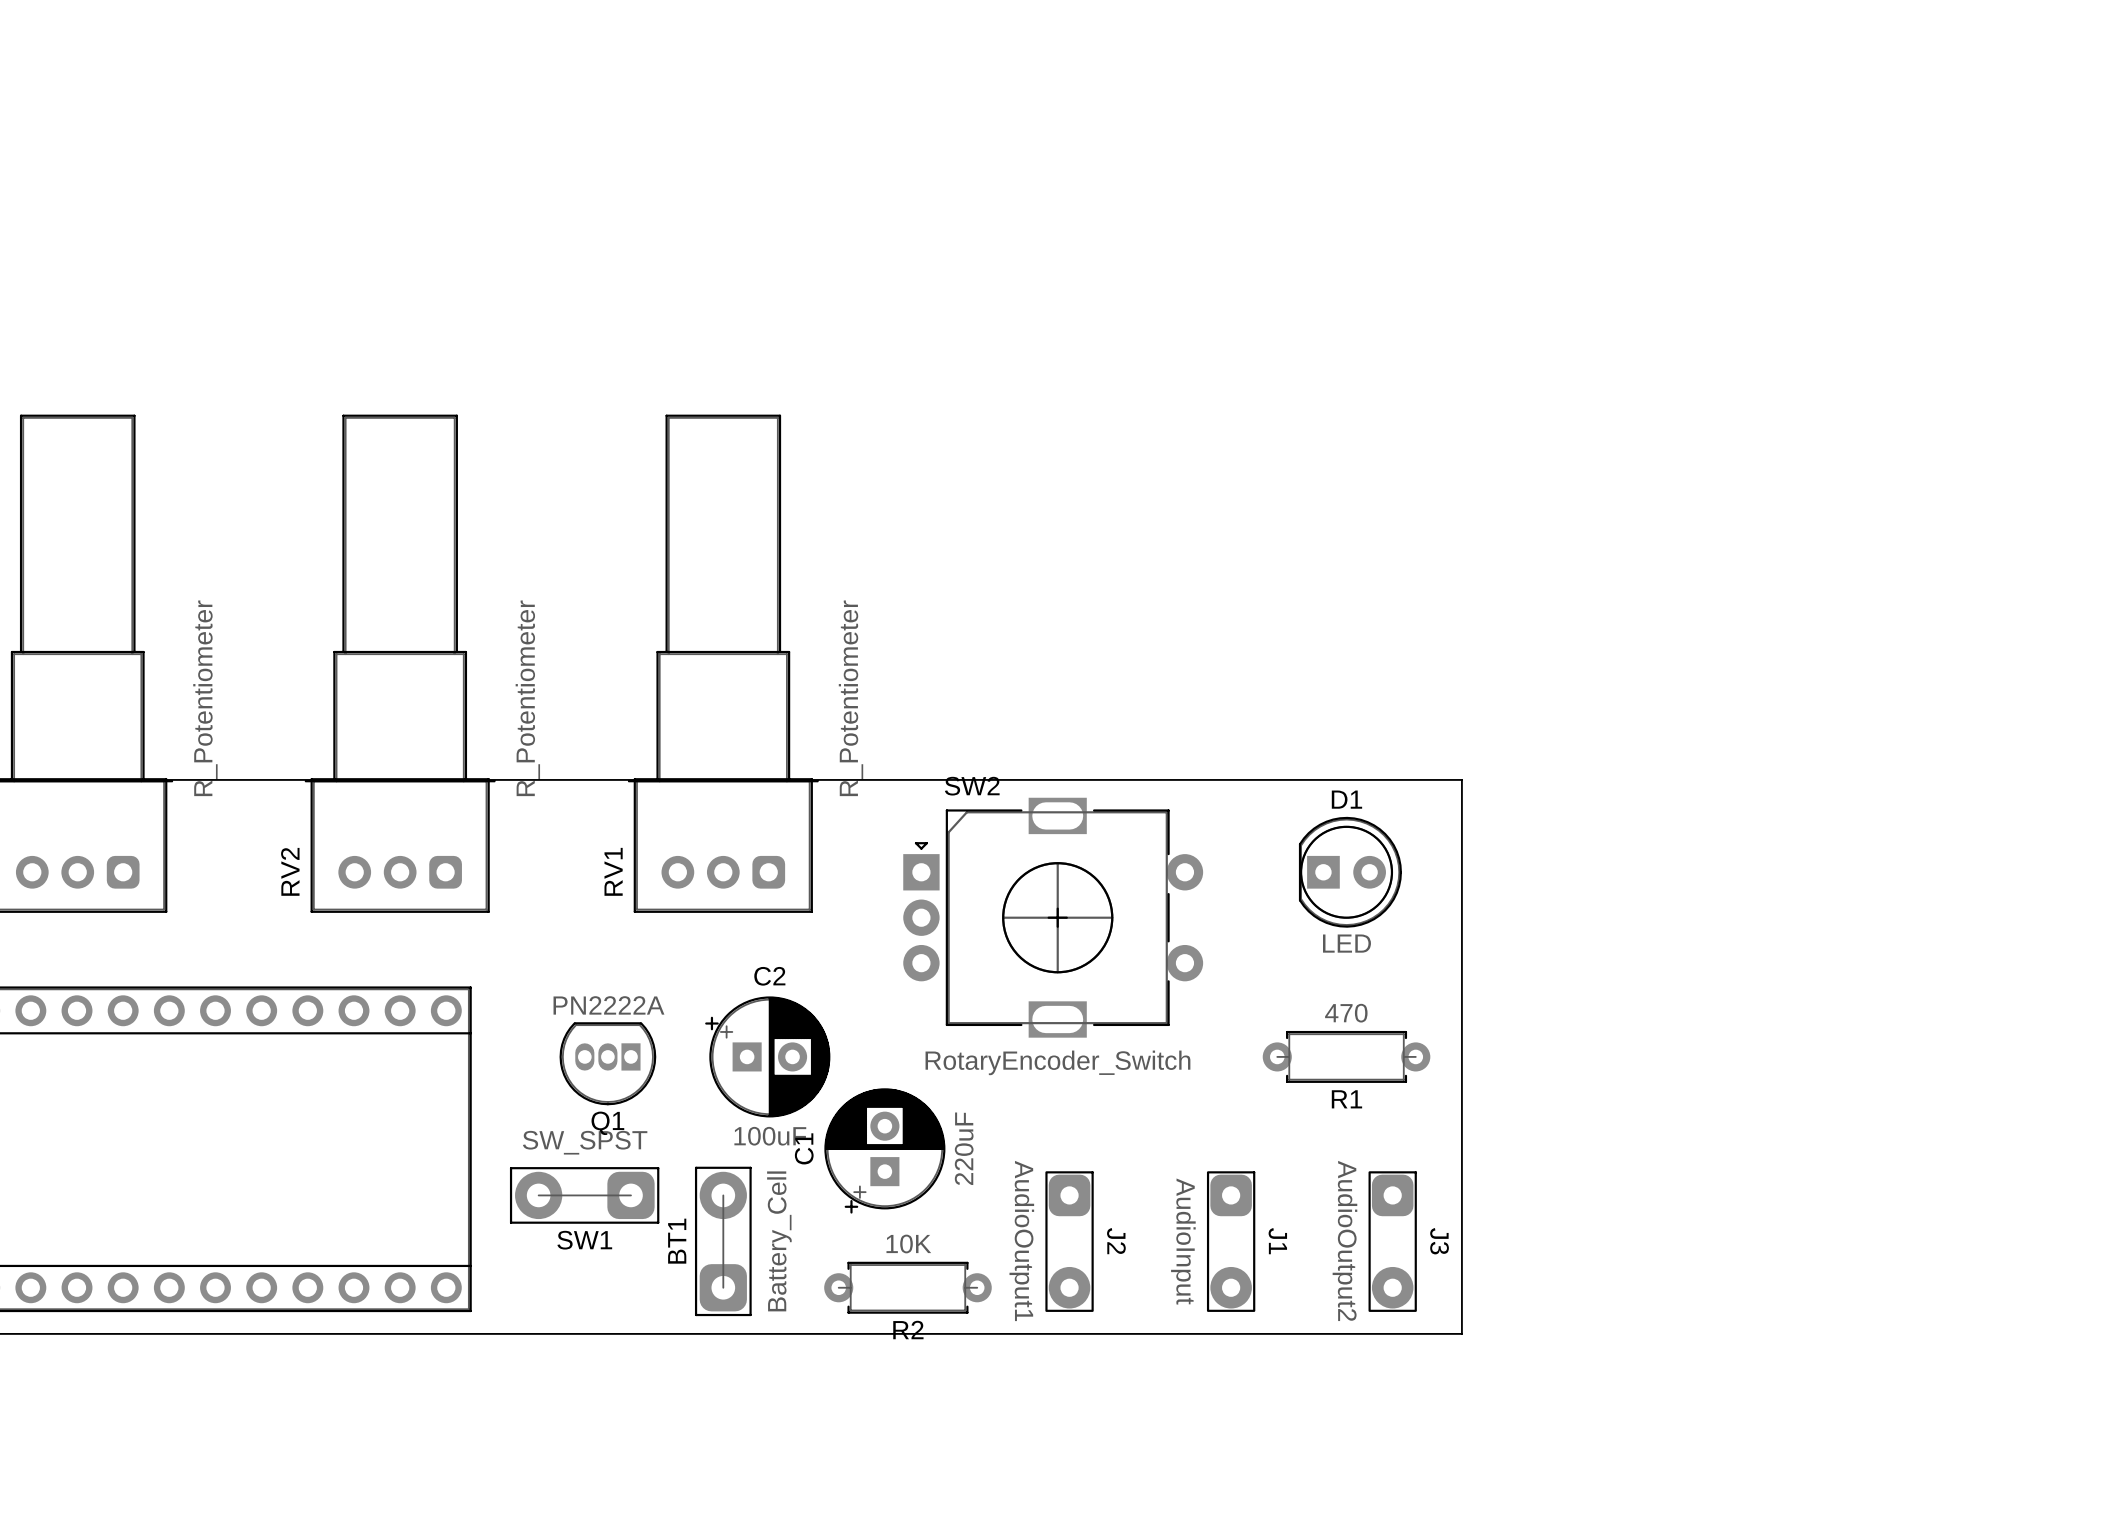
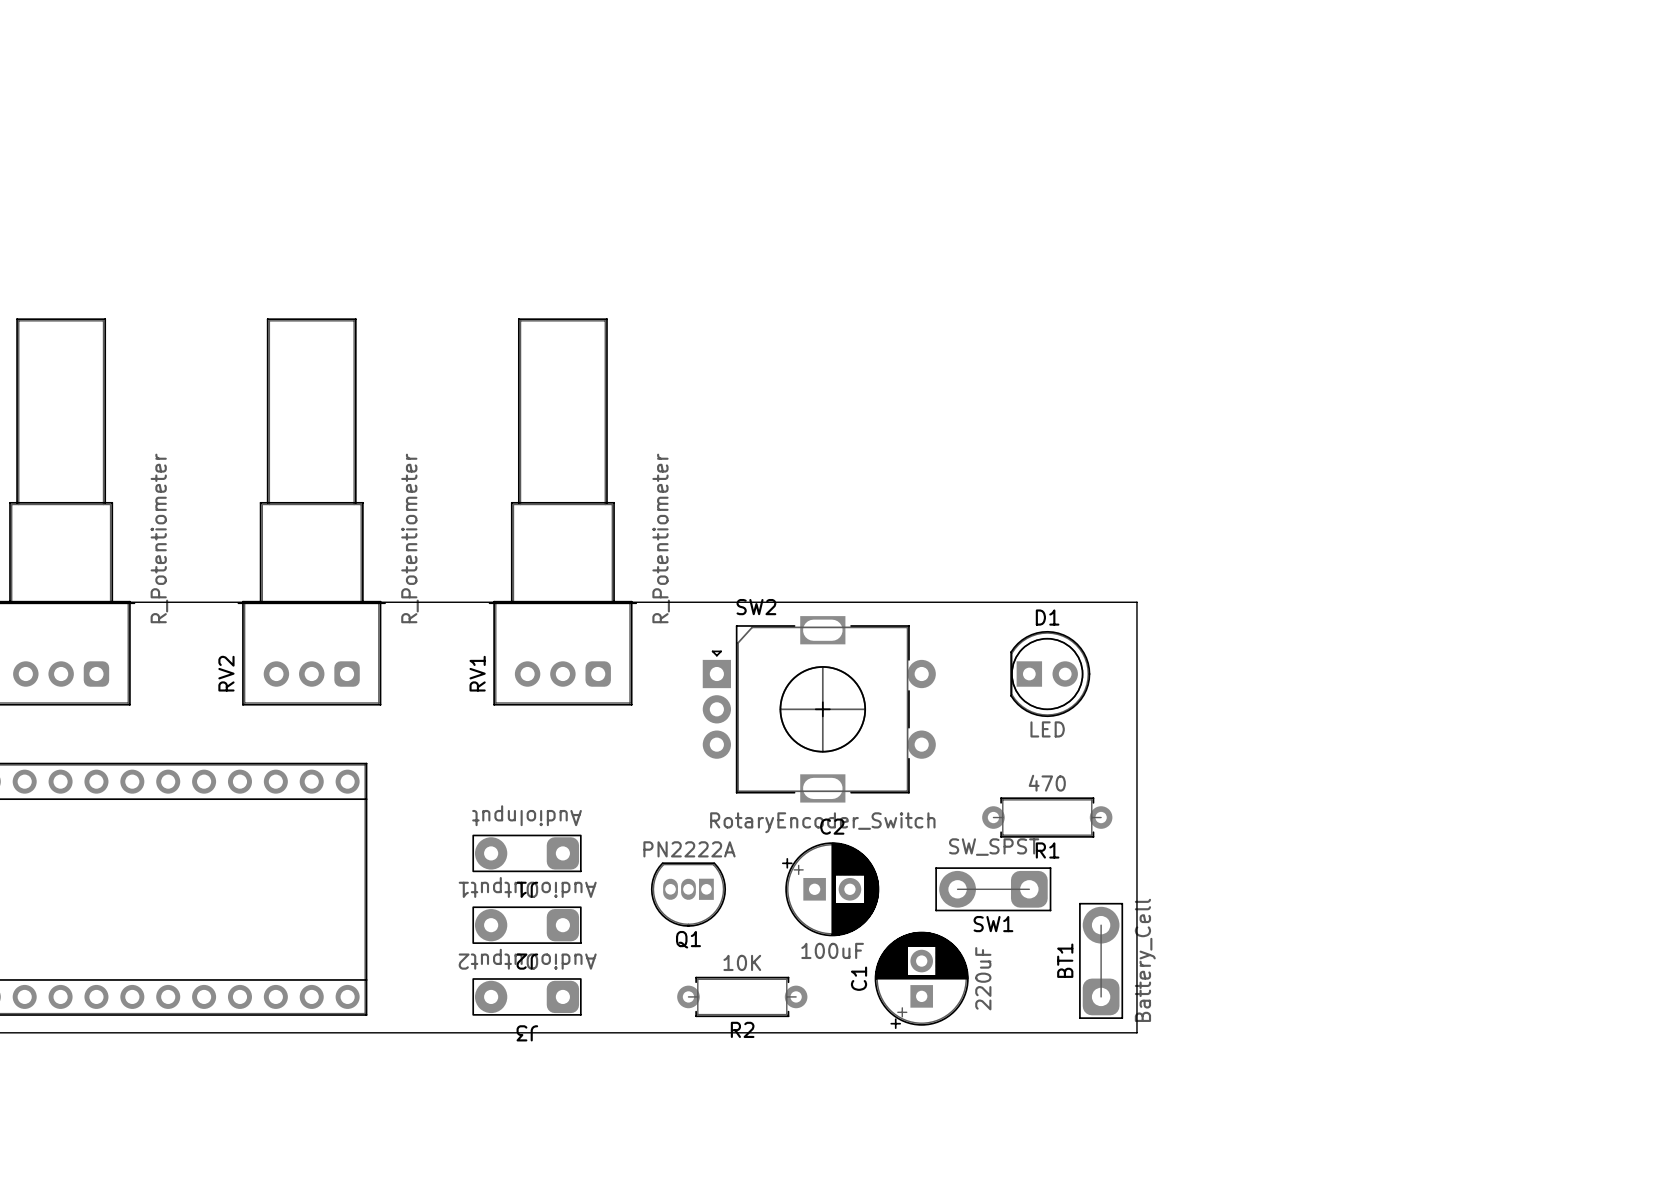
C2 position: (767, 1056) -> (830, 889)
Q1 position: (607, 1063) -> (688, 894)
C1 position: (884, 1150) -> (921, 980)
SW1 position: (584, 1195) -> (993, 889)
BT1 position: (723, 1241) -> (1101, 960)
J2 rotation: 0° (1069, 1241) -> 90° clockwise (527, 925)
J2 position: (1069, 1241) -> (527, 925)
J1 rotation: 0° (1231, 1241) -> 90° clockwise (527, 853)
J1 position: (1231, 1241) -> (527, 853)
J3 rotation: 0° (1392, 1241) -> 90° clockwise (527, 996)
J3 position: (1392, 1241) -> (527, 996)
R2 position: (907, 1287) -> (742, 996)

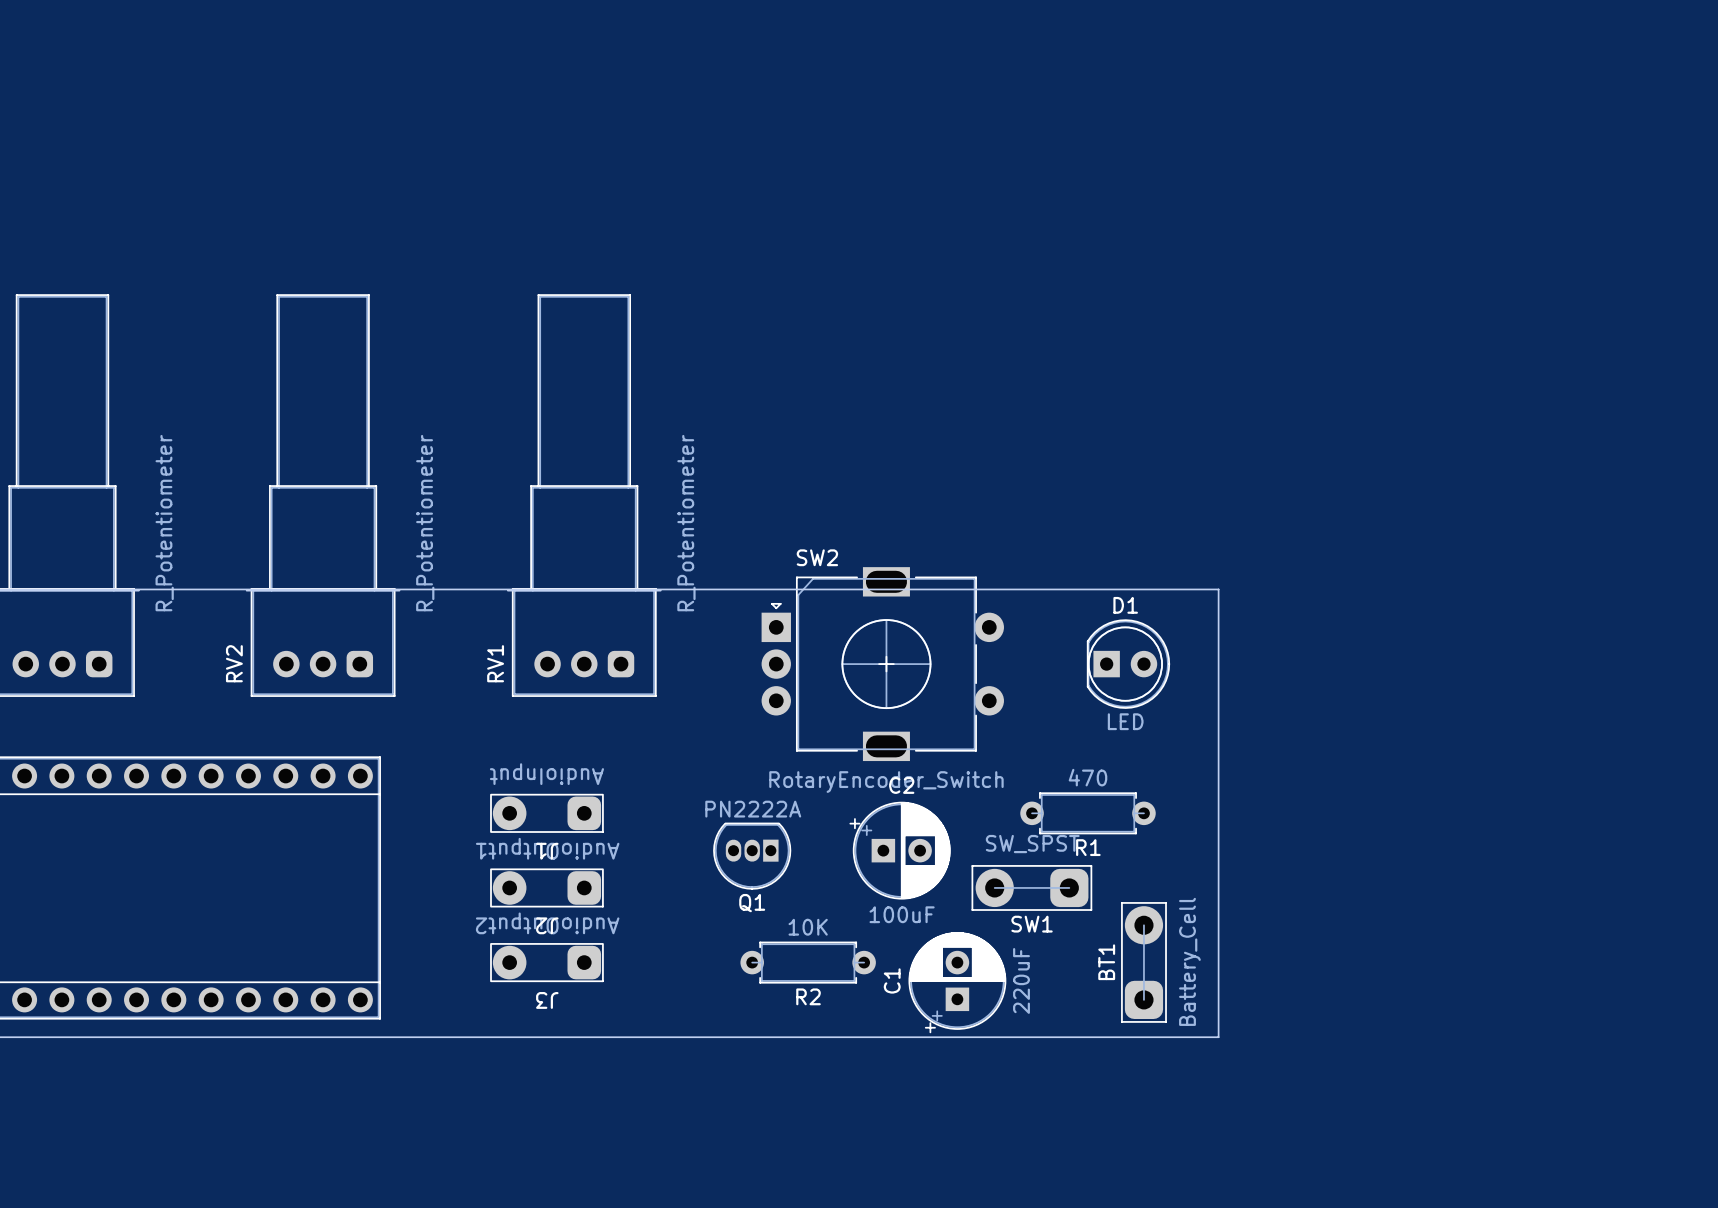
board edge: (1136, 602) (1136, 1032) -> (1181, 589) (1218, 589) (1218, 1037) (1181, 1037)
D1 position: (1050, 674) -> (1128, 664)
SW2 position: (819, 709) -> (882, 664)
J1 position: (527, 853) -> (546, 813)
C2 position: (830, 889) -> (900, 850)
Q1 position: (688, 894) -> (752, 856)
J2 position: (527, 925) -> (546, 887)
J3 position: (527, 996) -> (546, 962)
R2 position: (742, 996) -> (808, 962)

